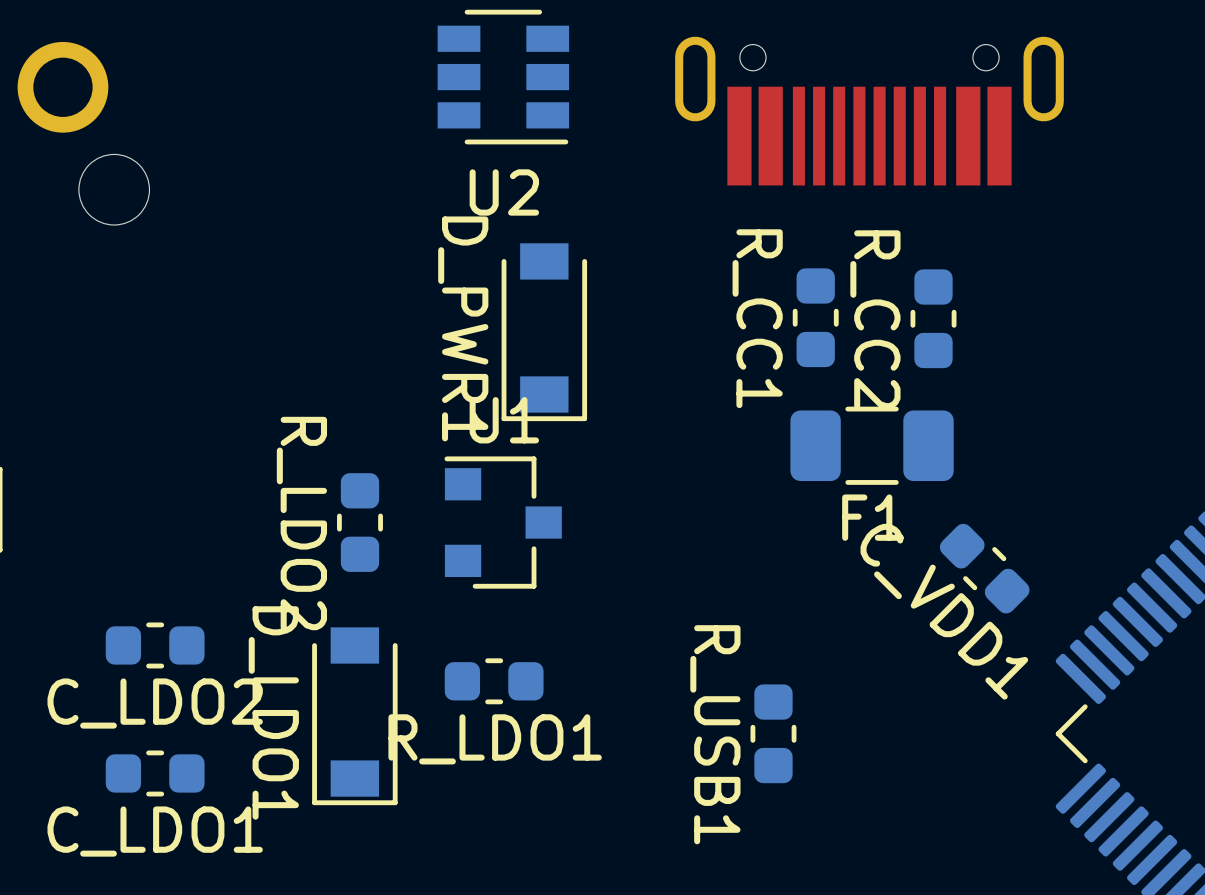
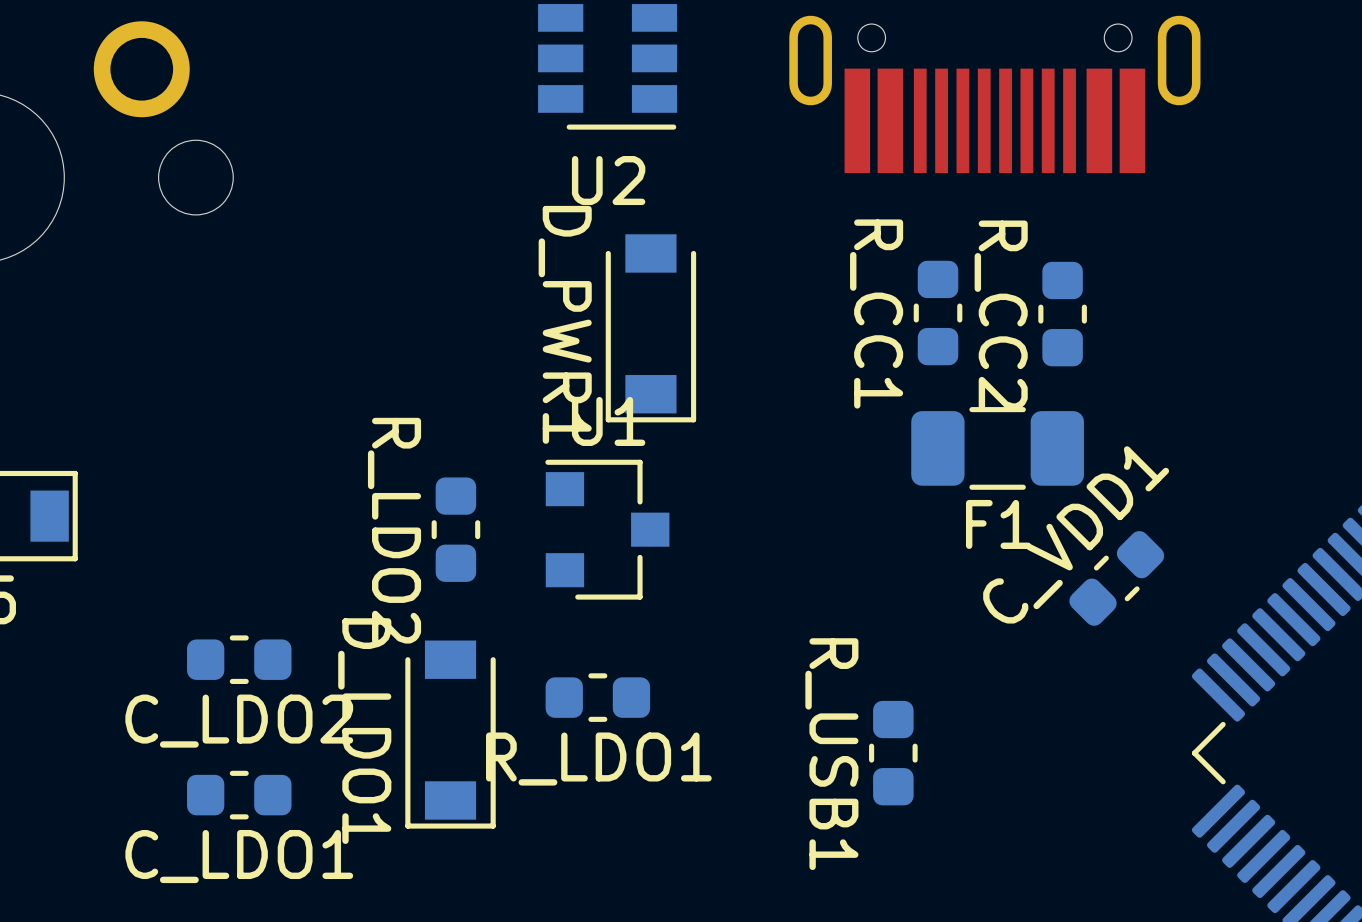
C_VDD1 rotation: 0° (984, 568) -> 90° clockwise (1116, 578)

